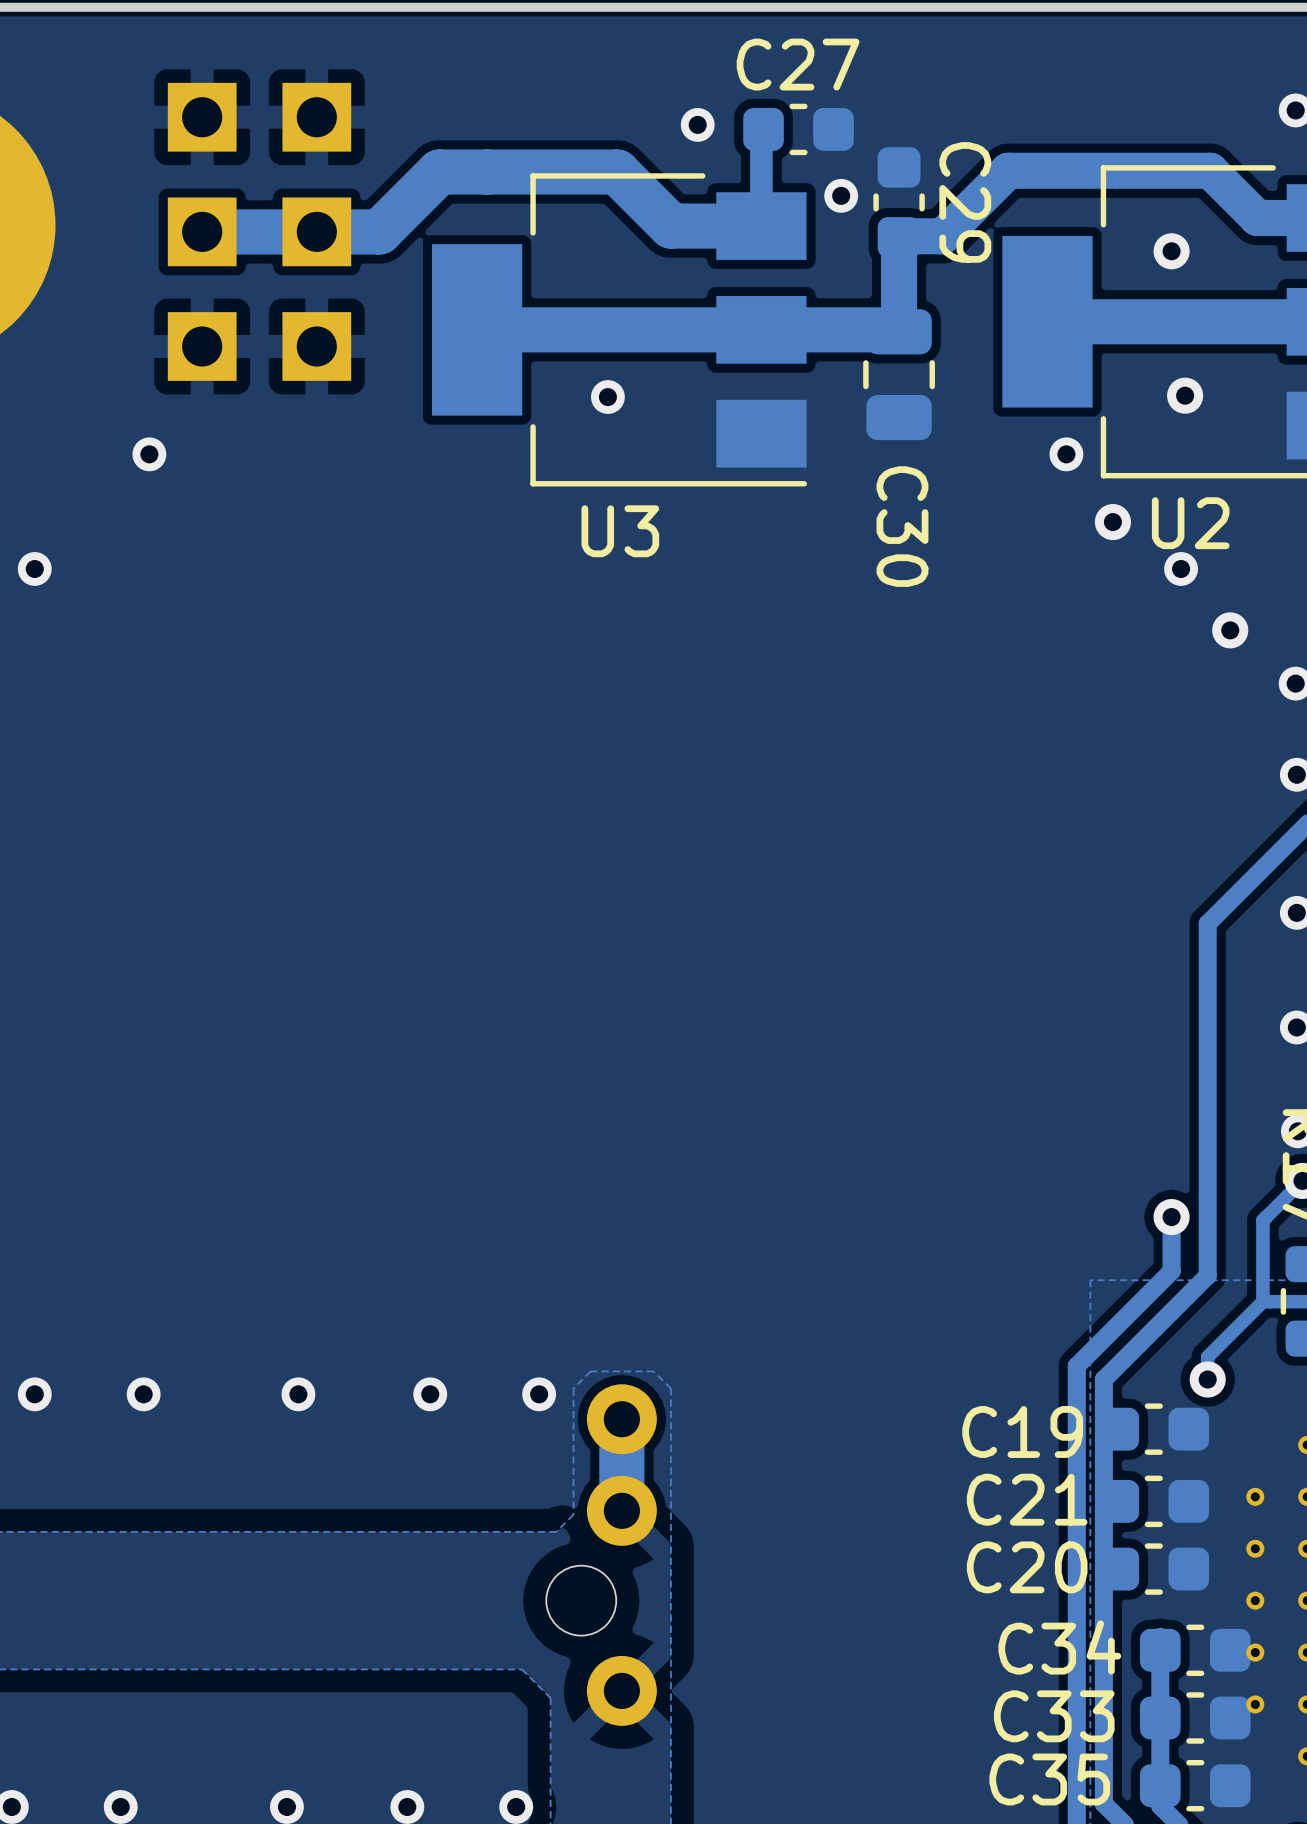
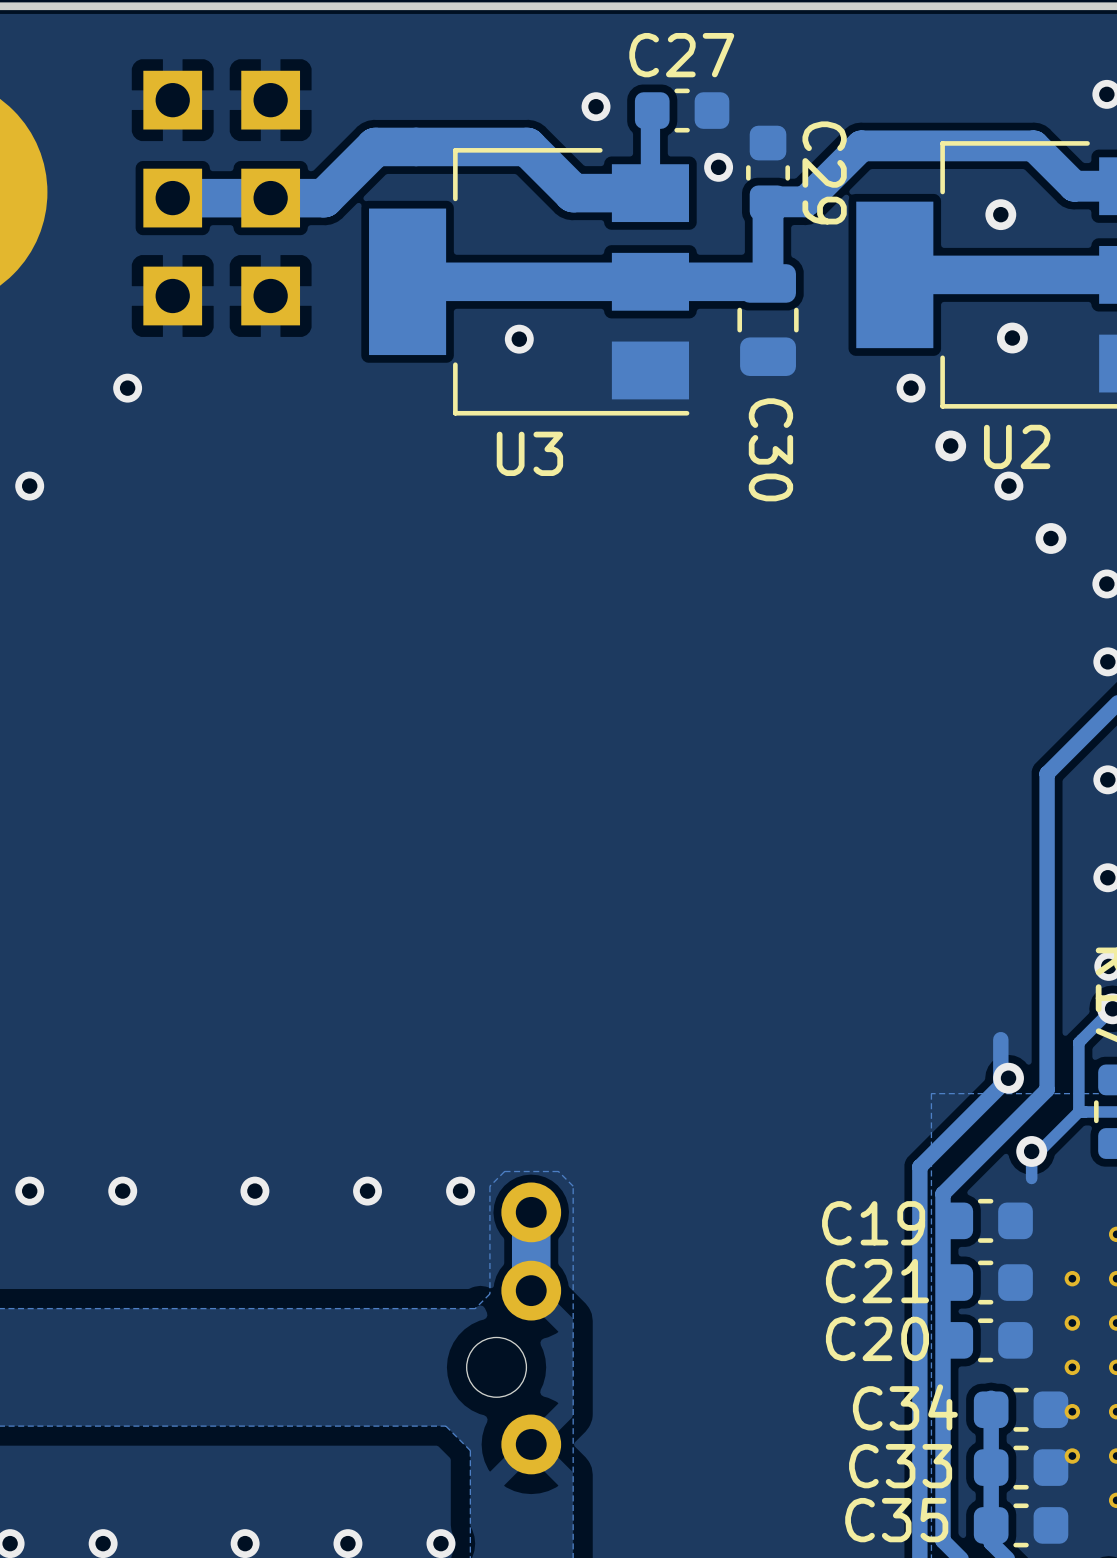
track: (1225, 905) (1207, 923) (1207, 1275) (1103, 1379) (1103, 1397) -> (1047, 773) (1047, 1089) (942, 1193)
via position: (1171, 1217) -> (1008, 1078)
via position: (1207, 1379) -> (1031, 1151)

